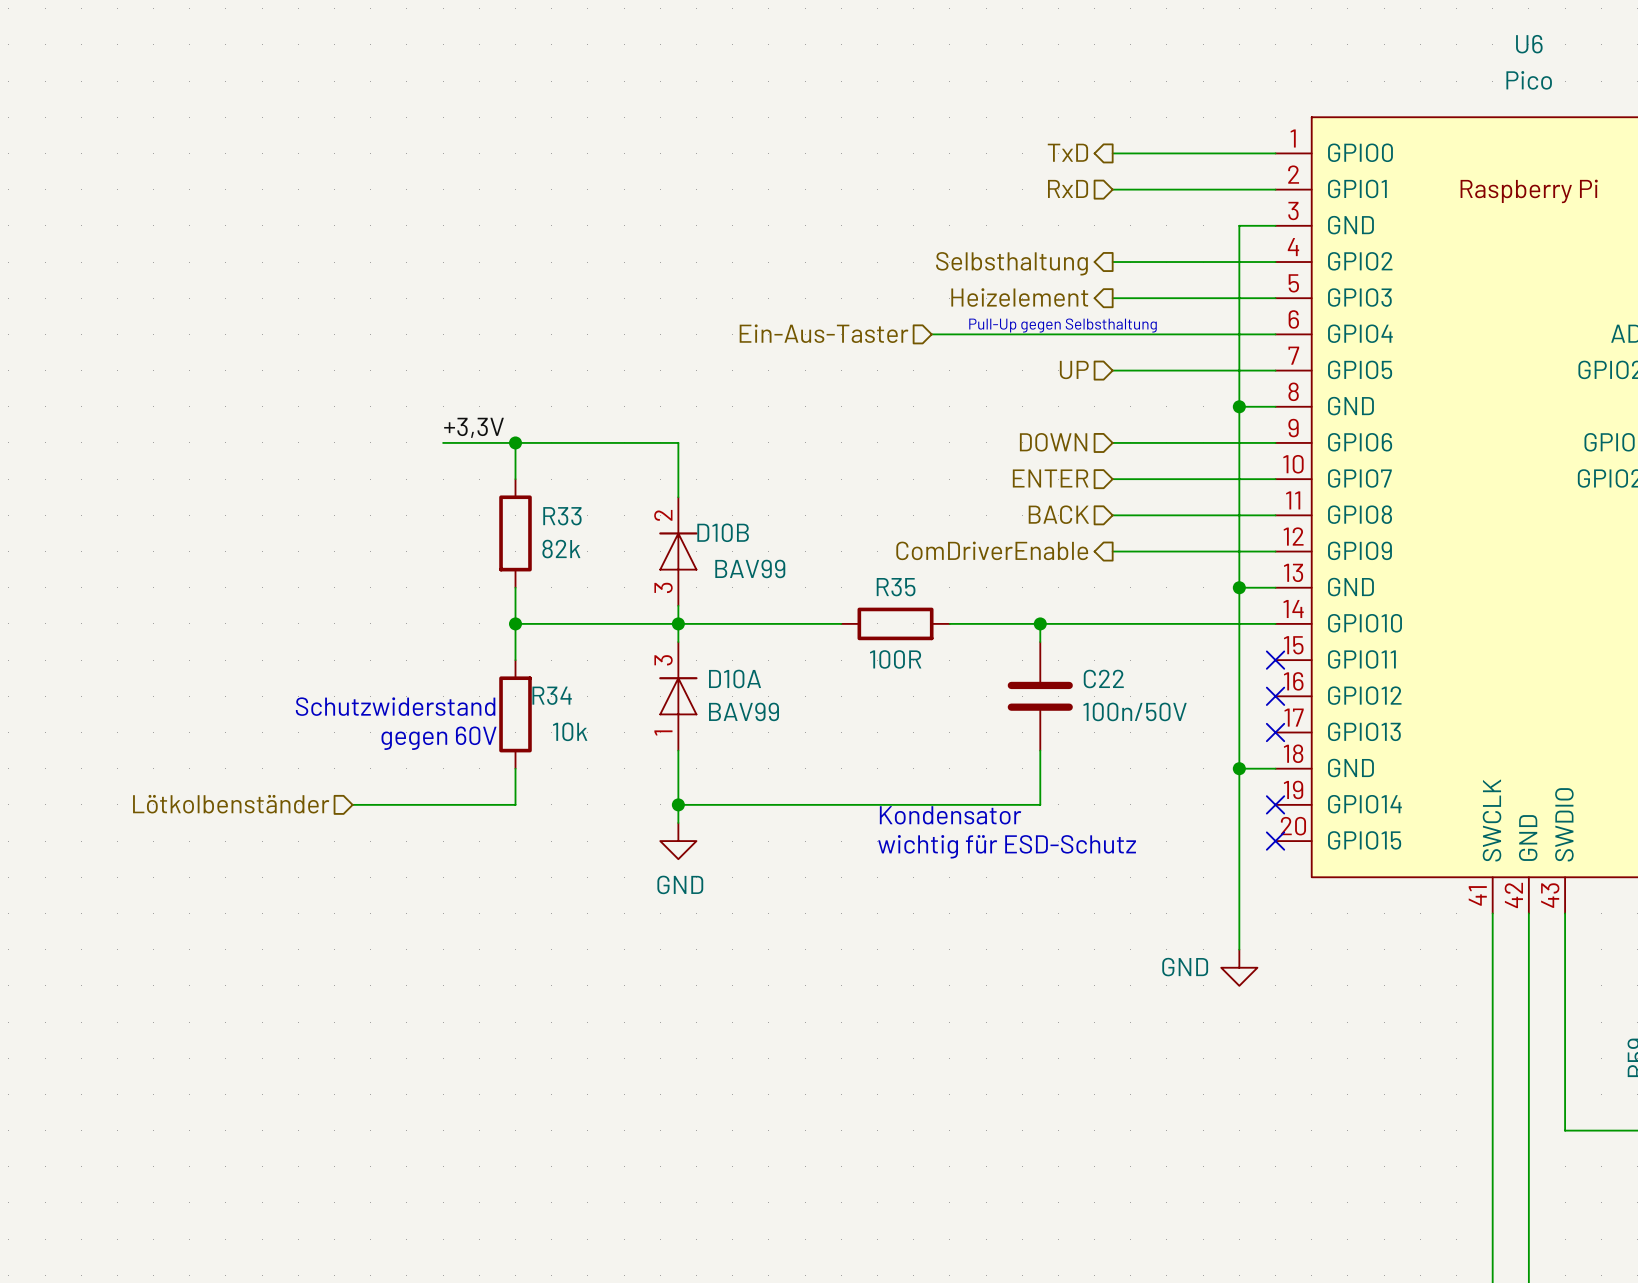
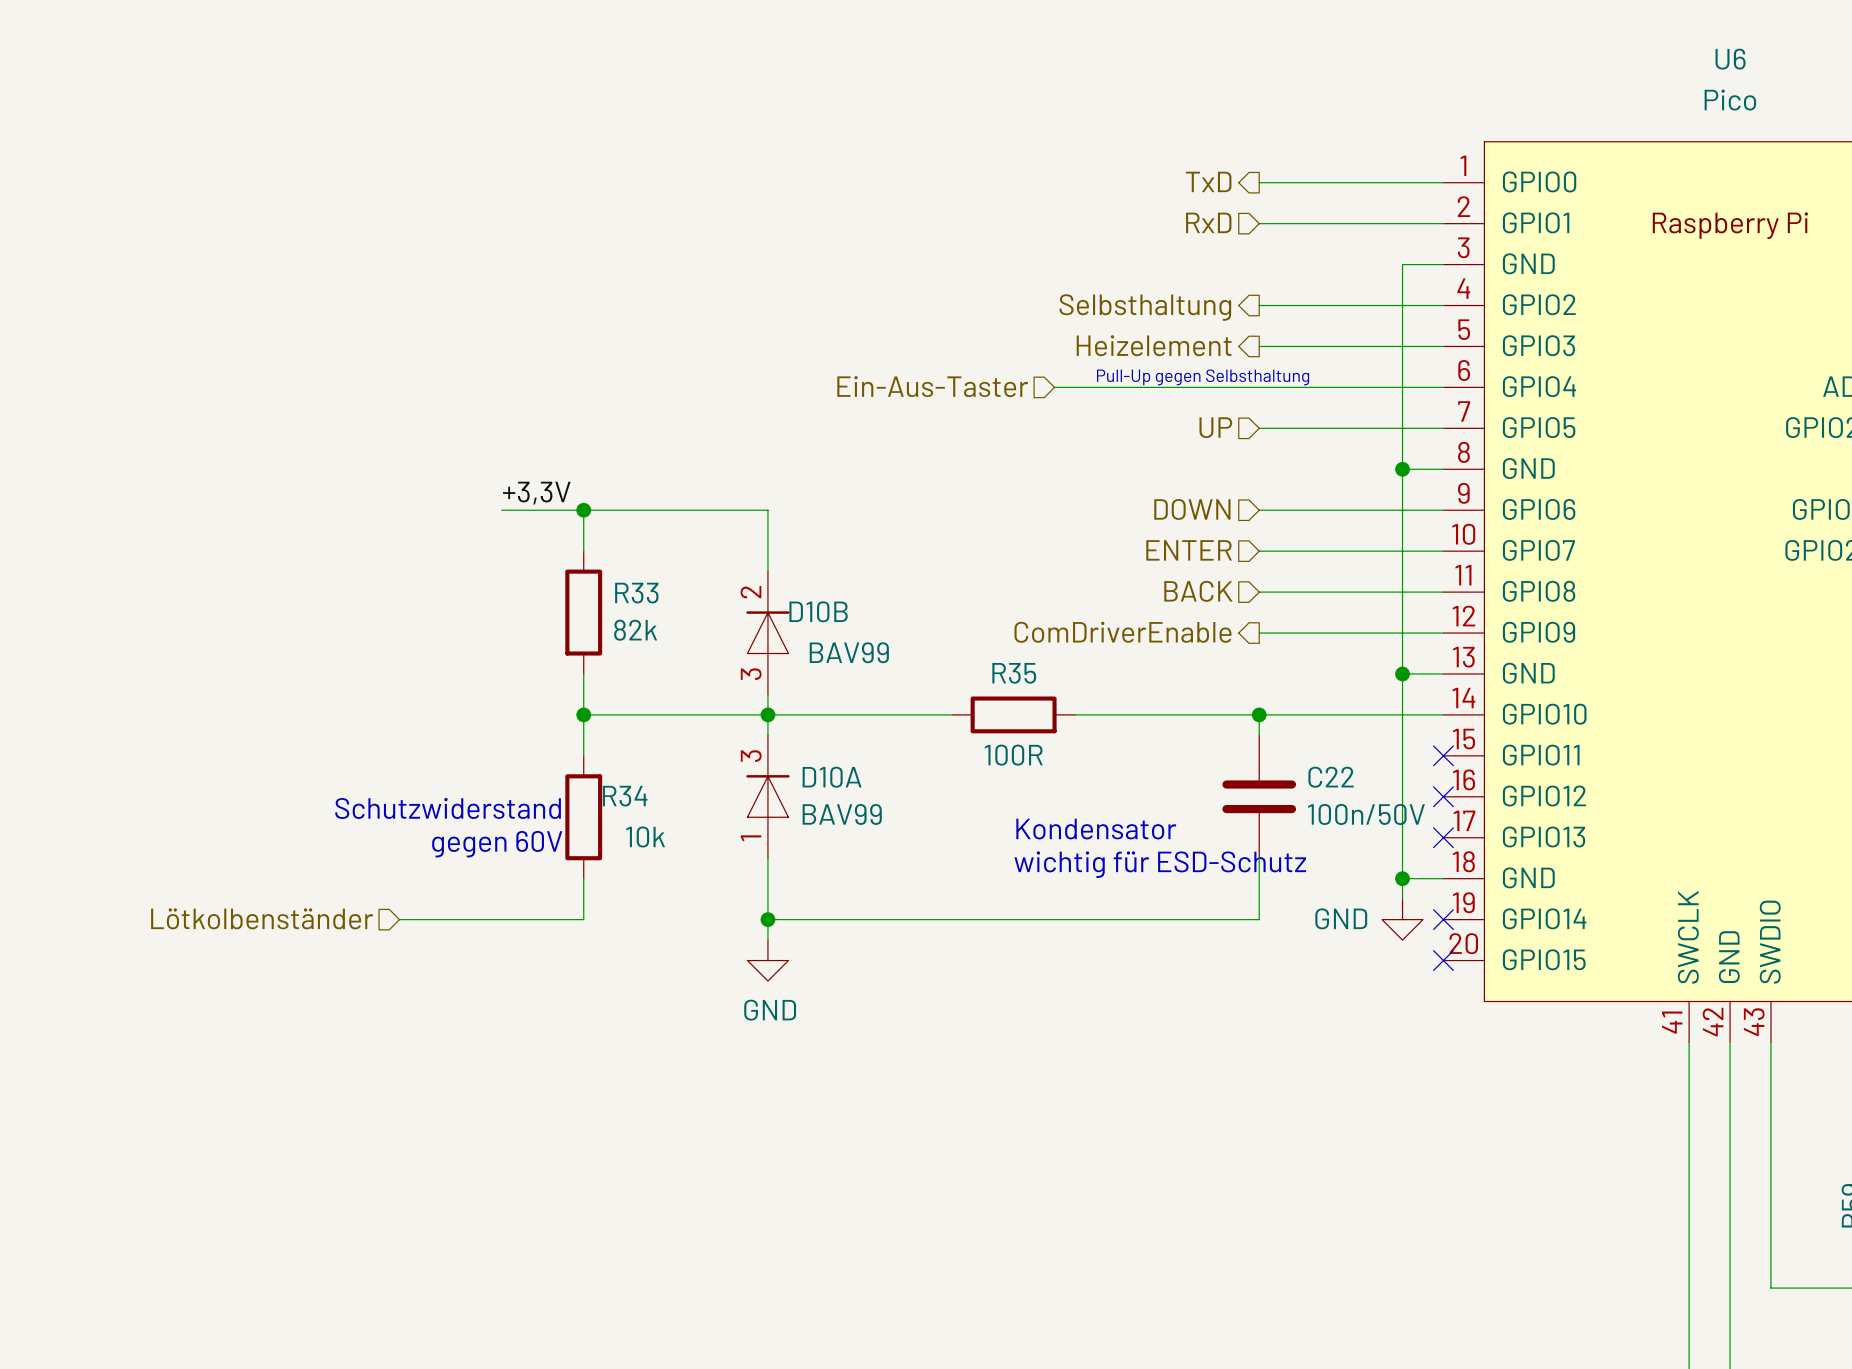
wire: (1040, 623) (1040, 642) -> (1259, 714) (1259, 735)
junction position: (1040, 623) -> (1259, 714)
C22 position: (1040, 696) -> (1259, 796)
wire: (1040, 750) (1040, 804) -> (1259, 858) (1259, 919) (1177, 919)
wire: (1239, 786) (1239, 949) -> none
text position: Kondensator (950, 815) -> Kondensator (1096, 829)
text position: wichtig für ESD-Schutz (1007, 846) -> wichtig für ESD-Schutz (1160, 864)
power symbol position: GND (1239, 967) -> GND (1402, 919)

